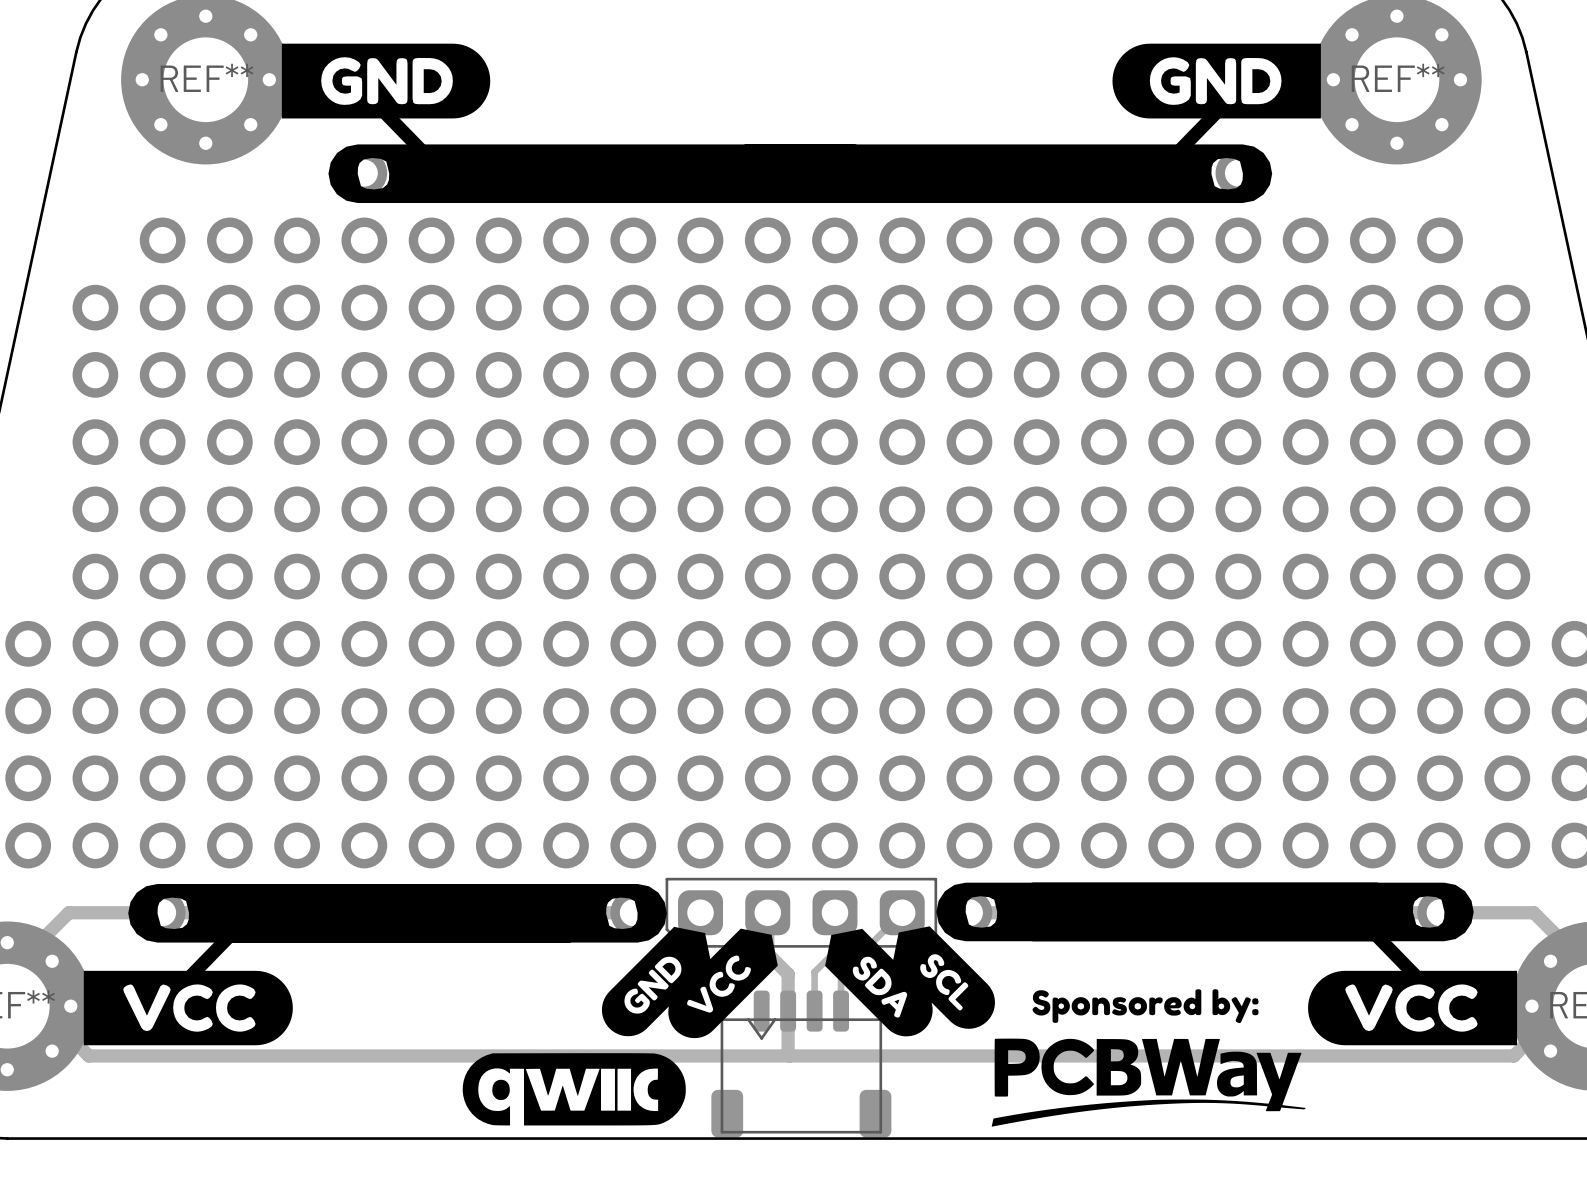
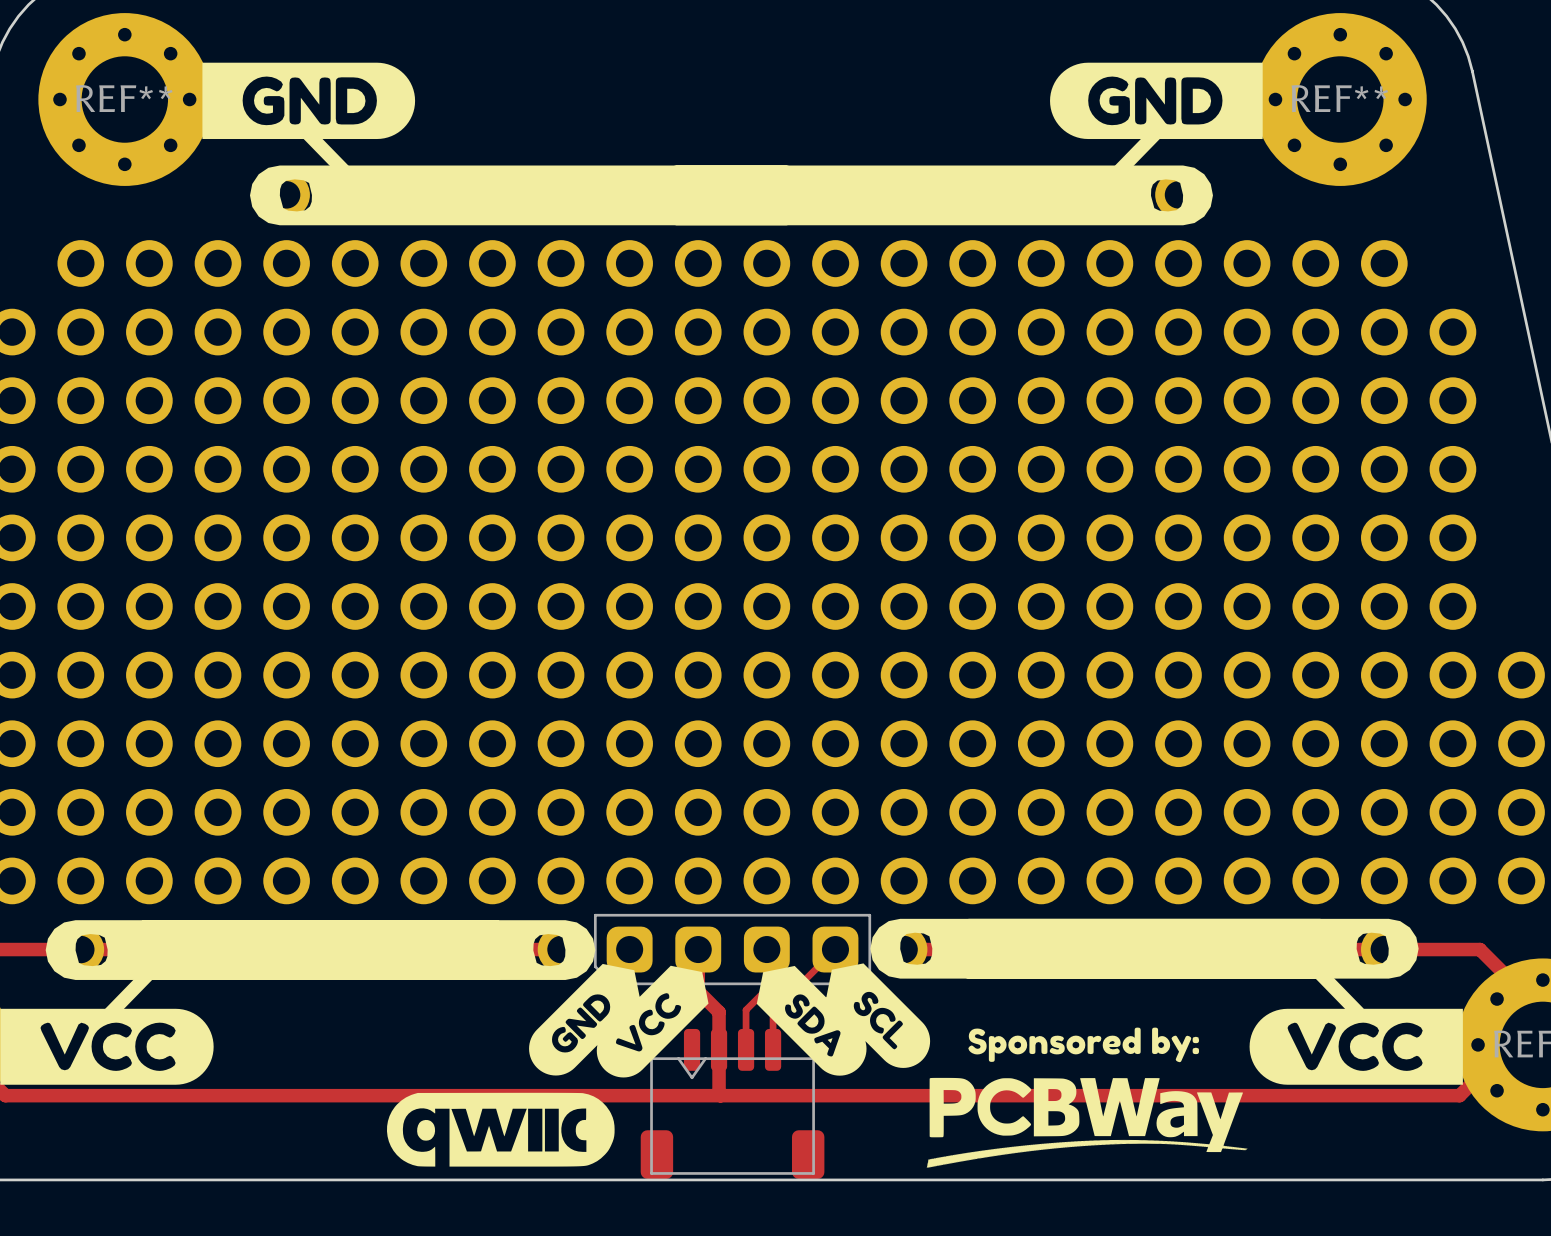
drawing shape: [991, 1038, 1306, 1127] -> [926, 1077, 1248, 1168]

